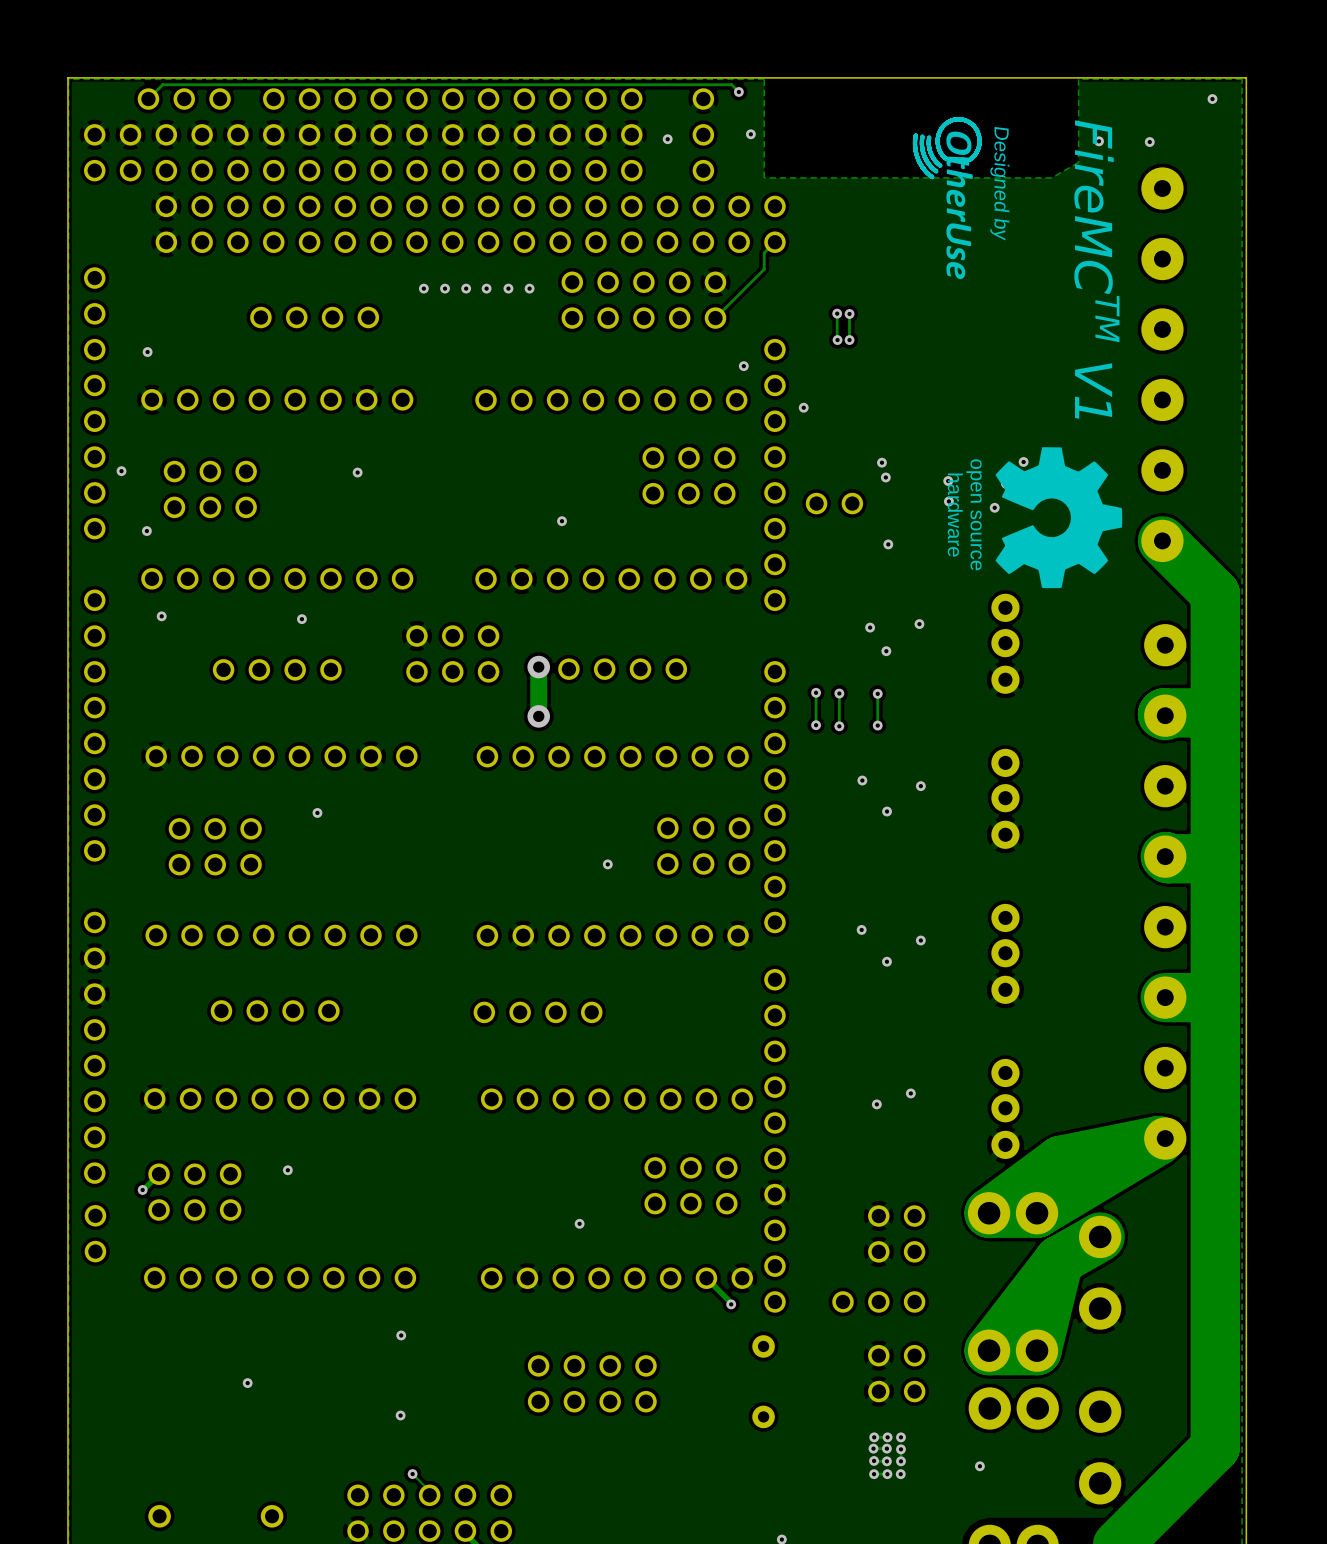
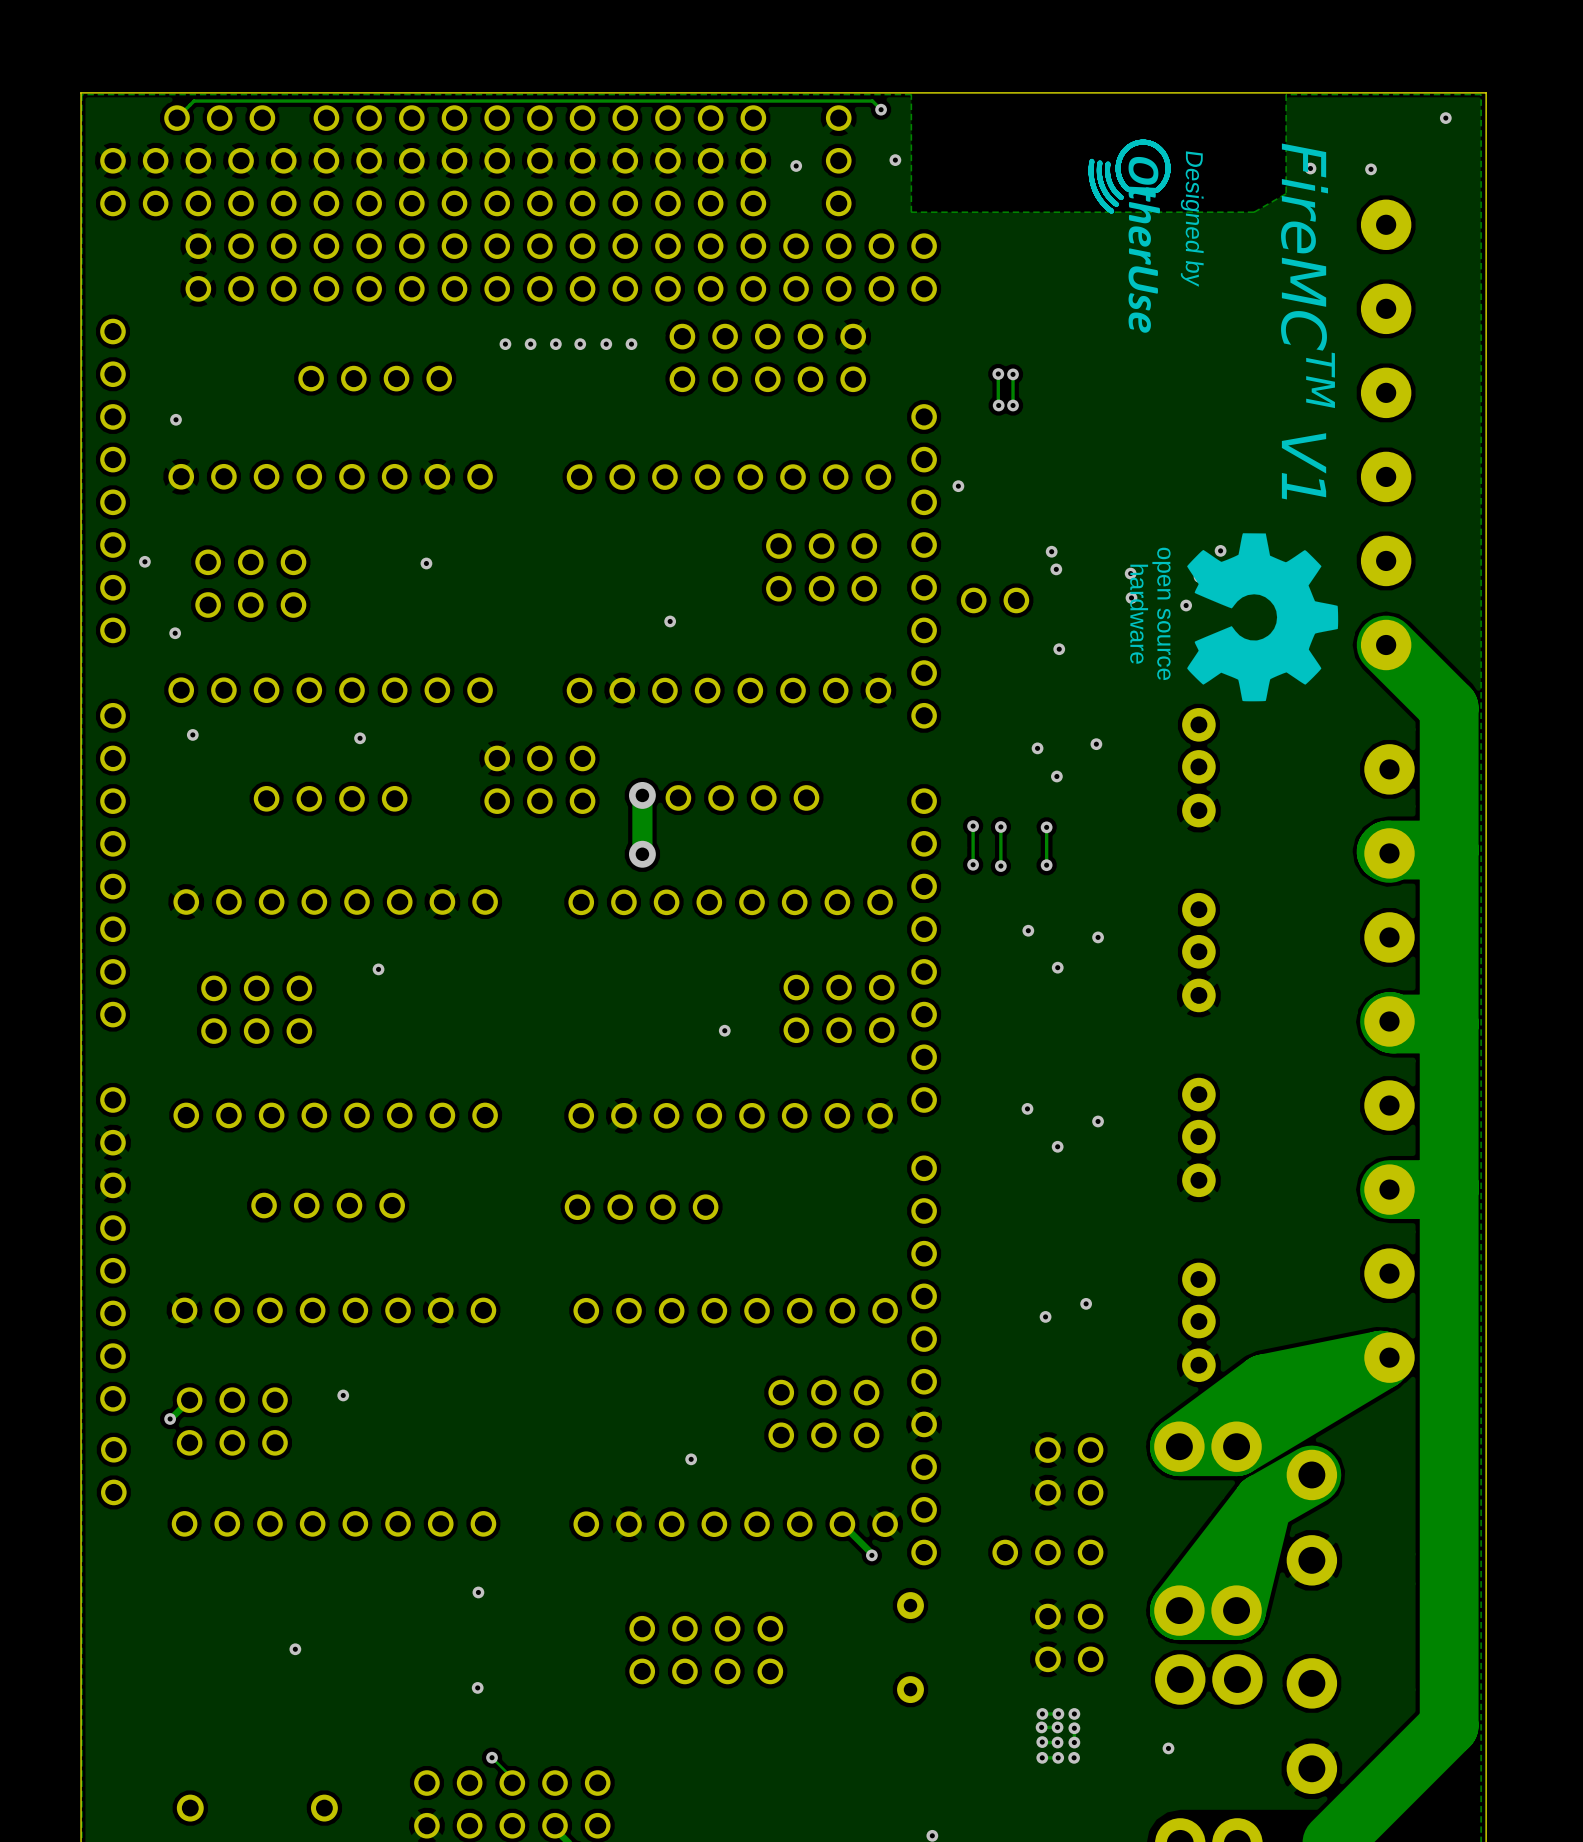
track: (774, 242) (764, 252) (764, 269) (715, 318) -> none
via: (743, 366) -> none

